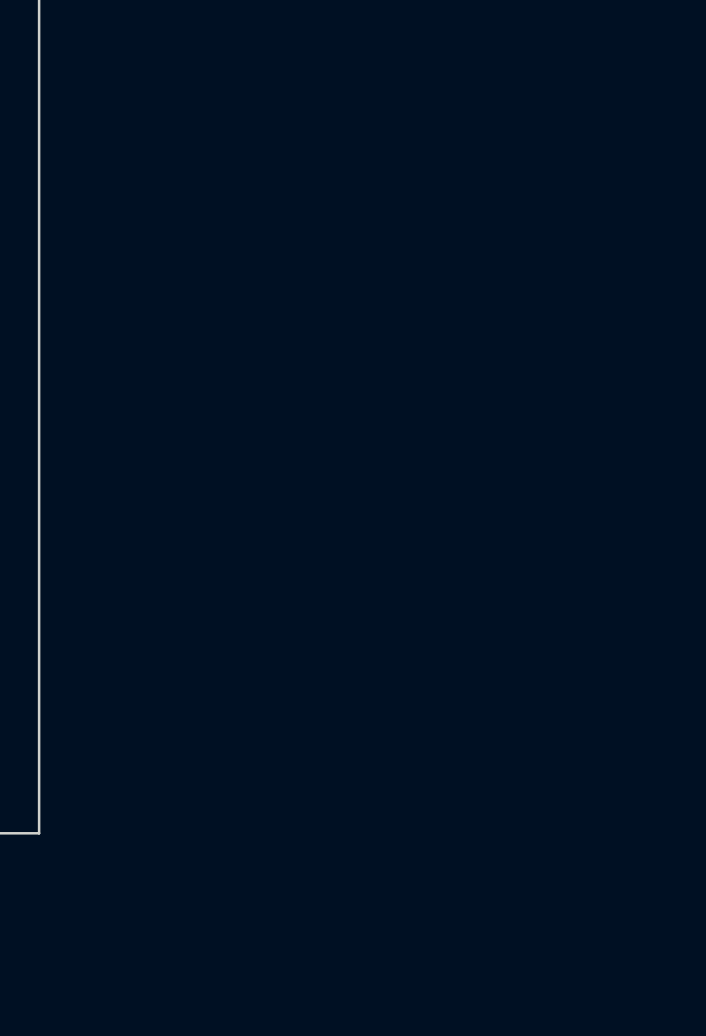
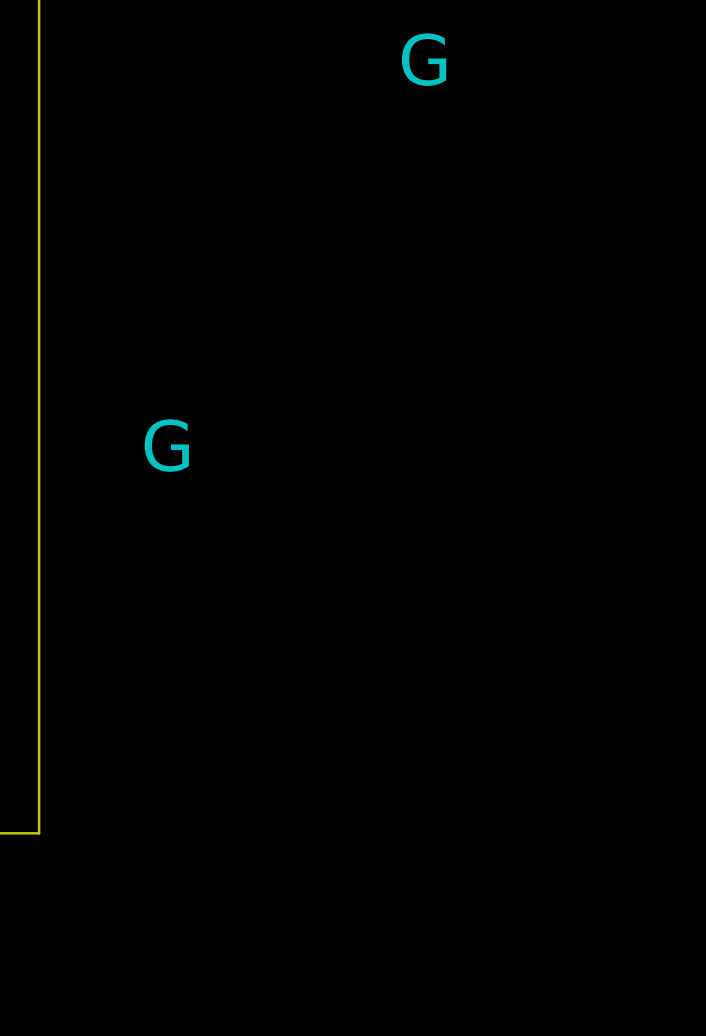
text: none -> G (424, 59)
text: none -> G (166, 445)

